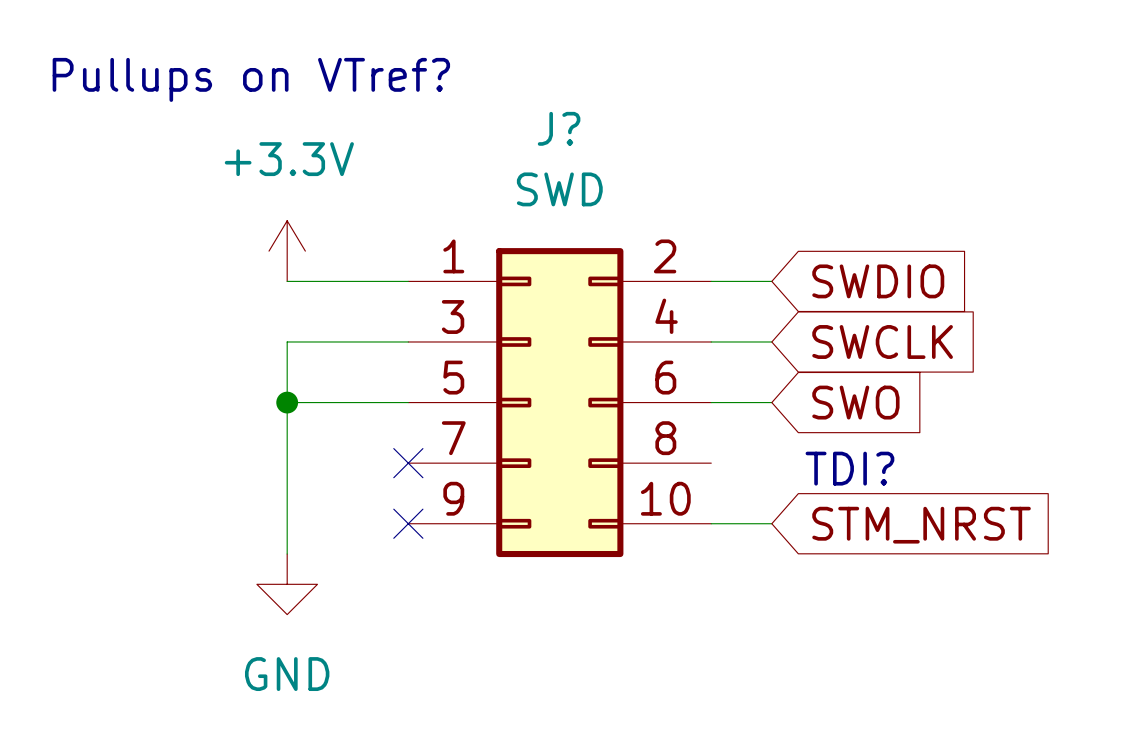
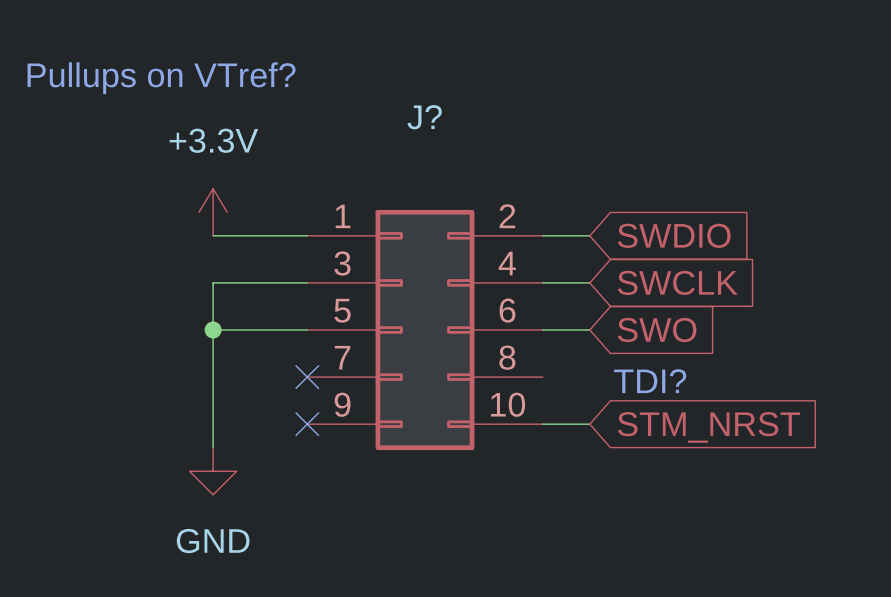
J? value: SWD (559, 189) -> none

